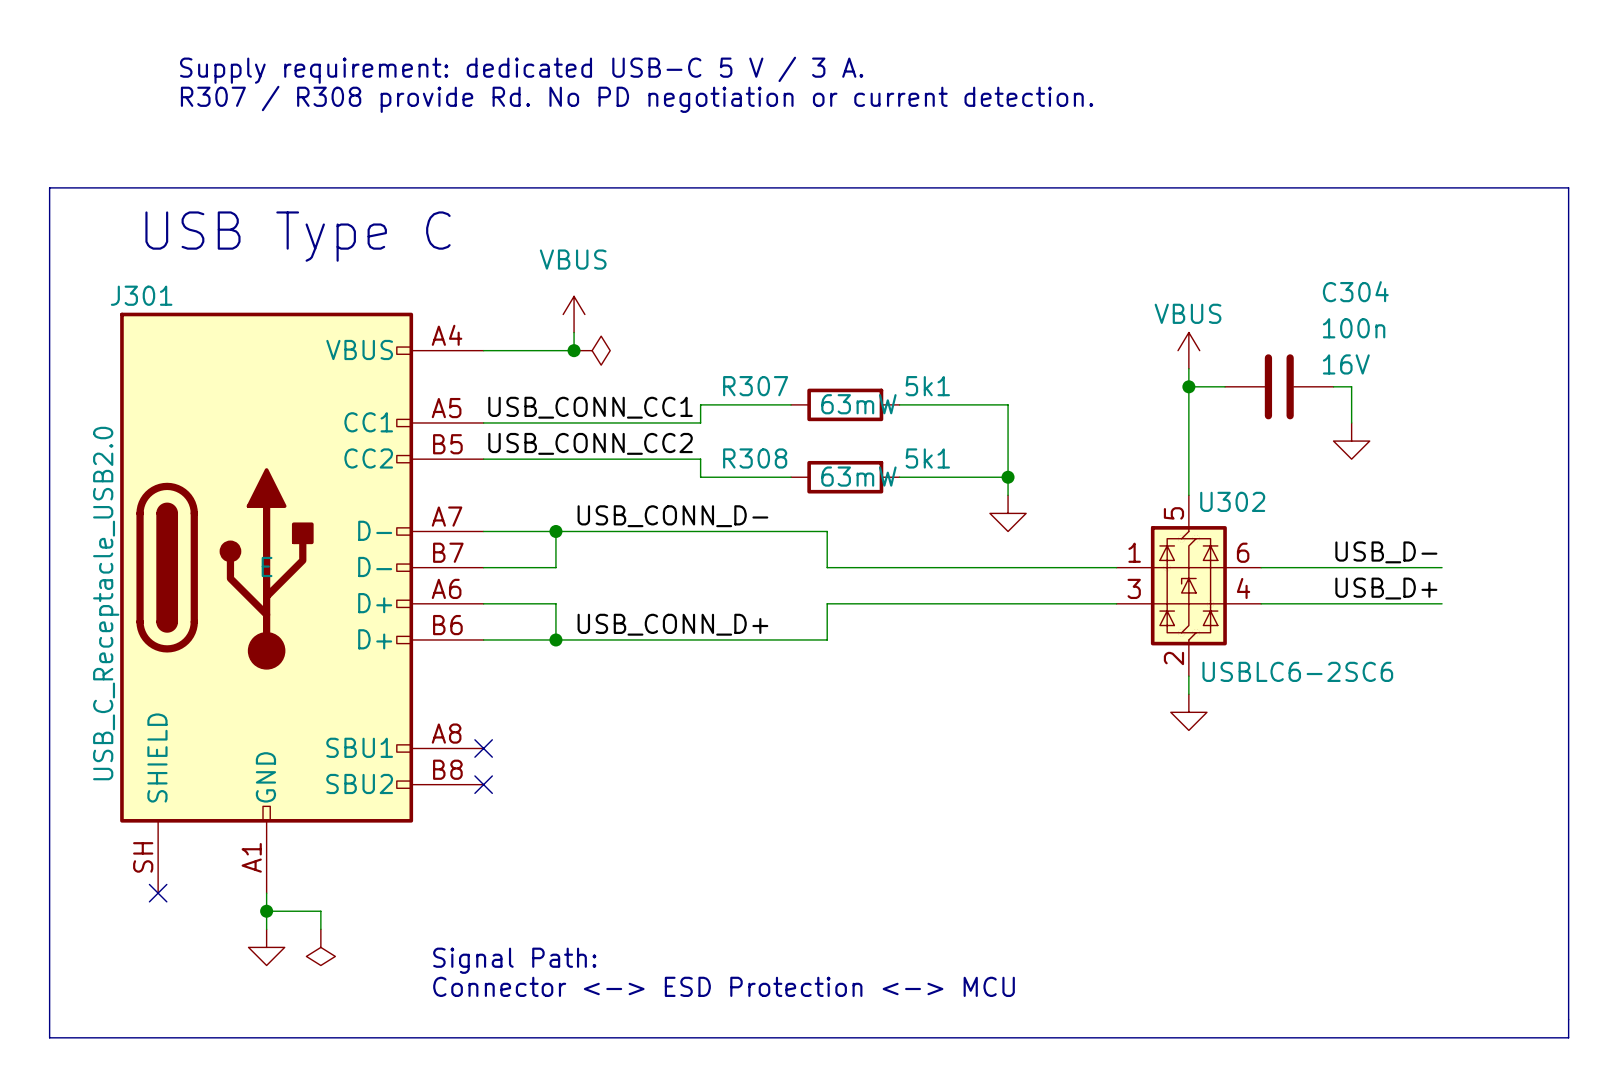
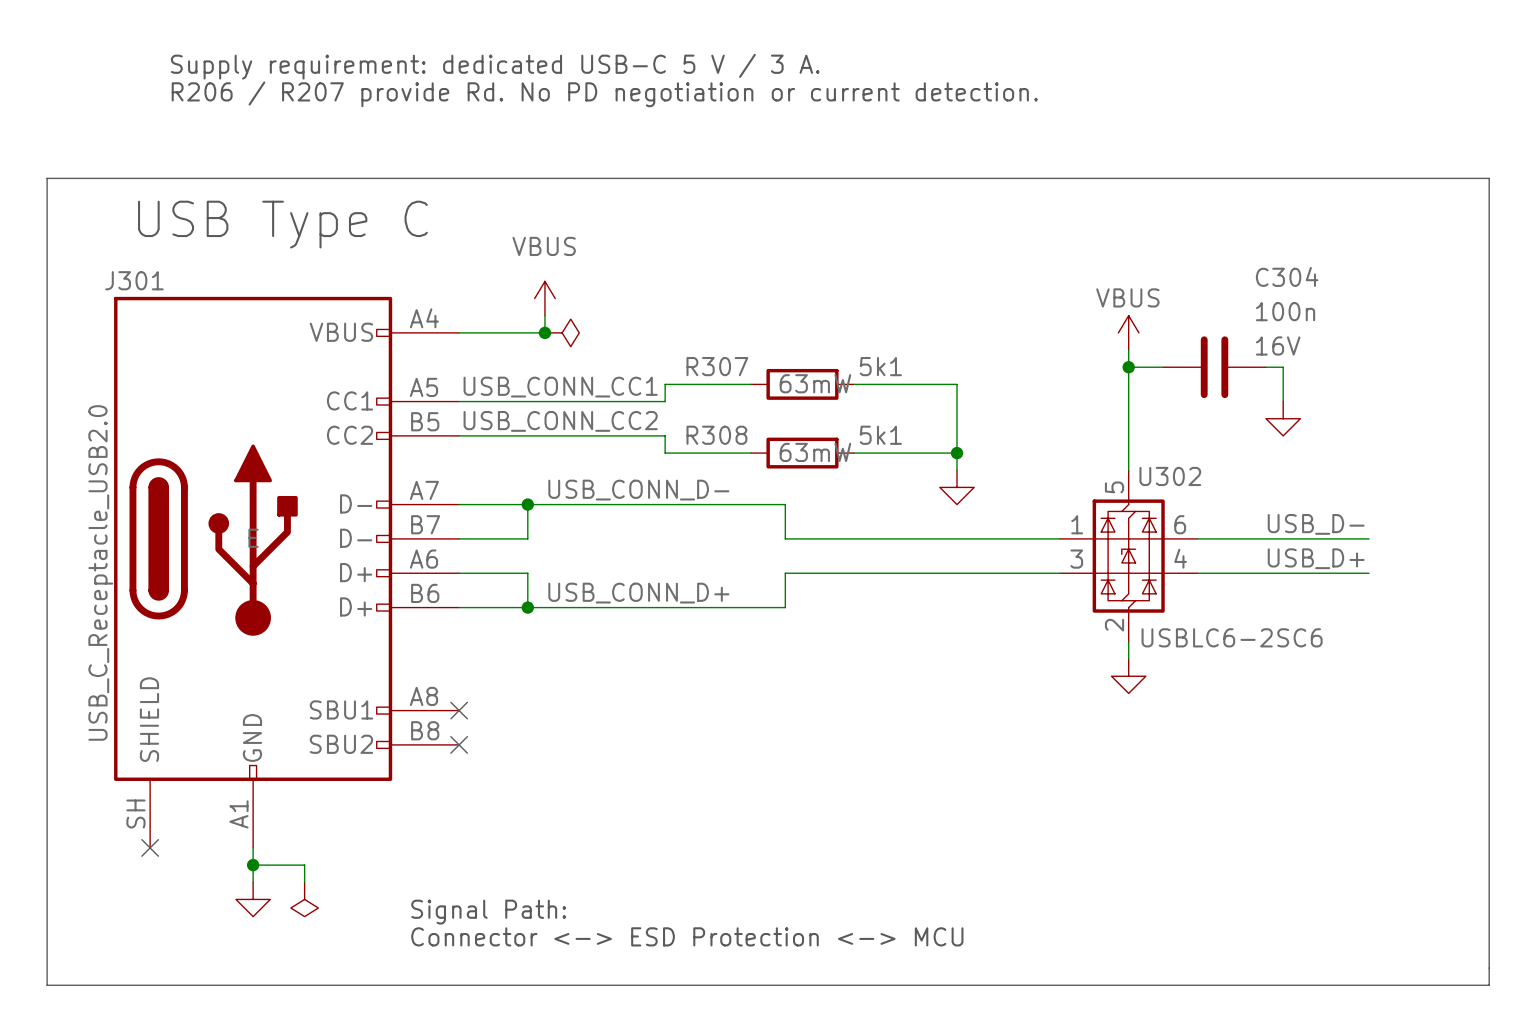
text: R307 / R308 provide Rd. No PD negotiation or current detection. (637, 99) -> R206 / R207 provide Rd. No PD negotiation or current detection. (604, 94)

